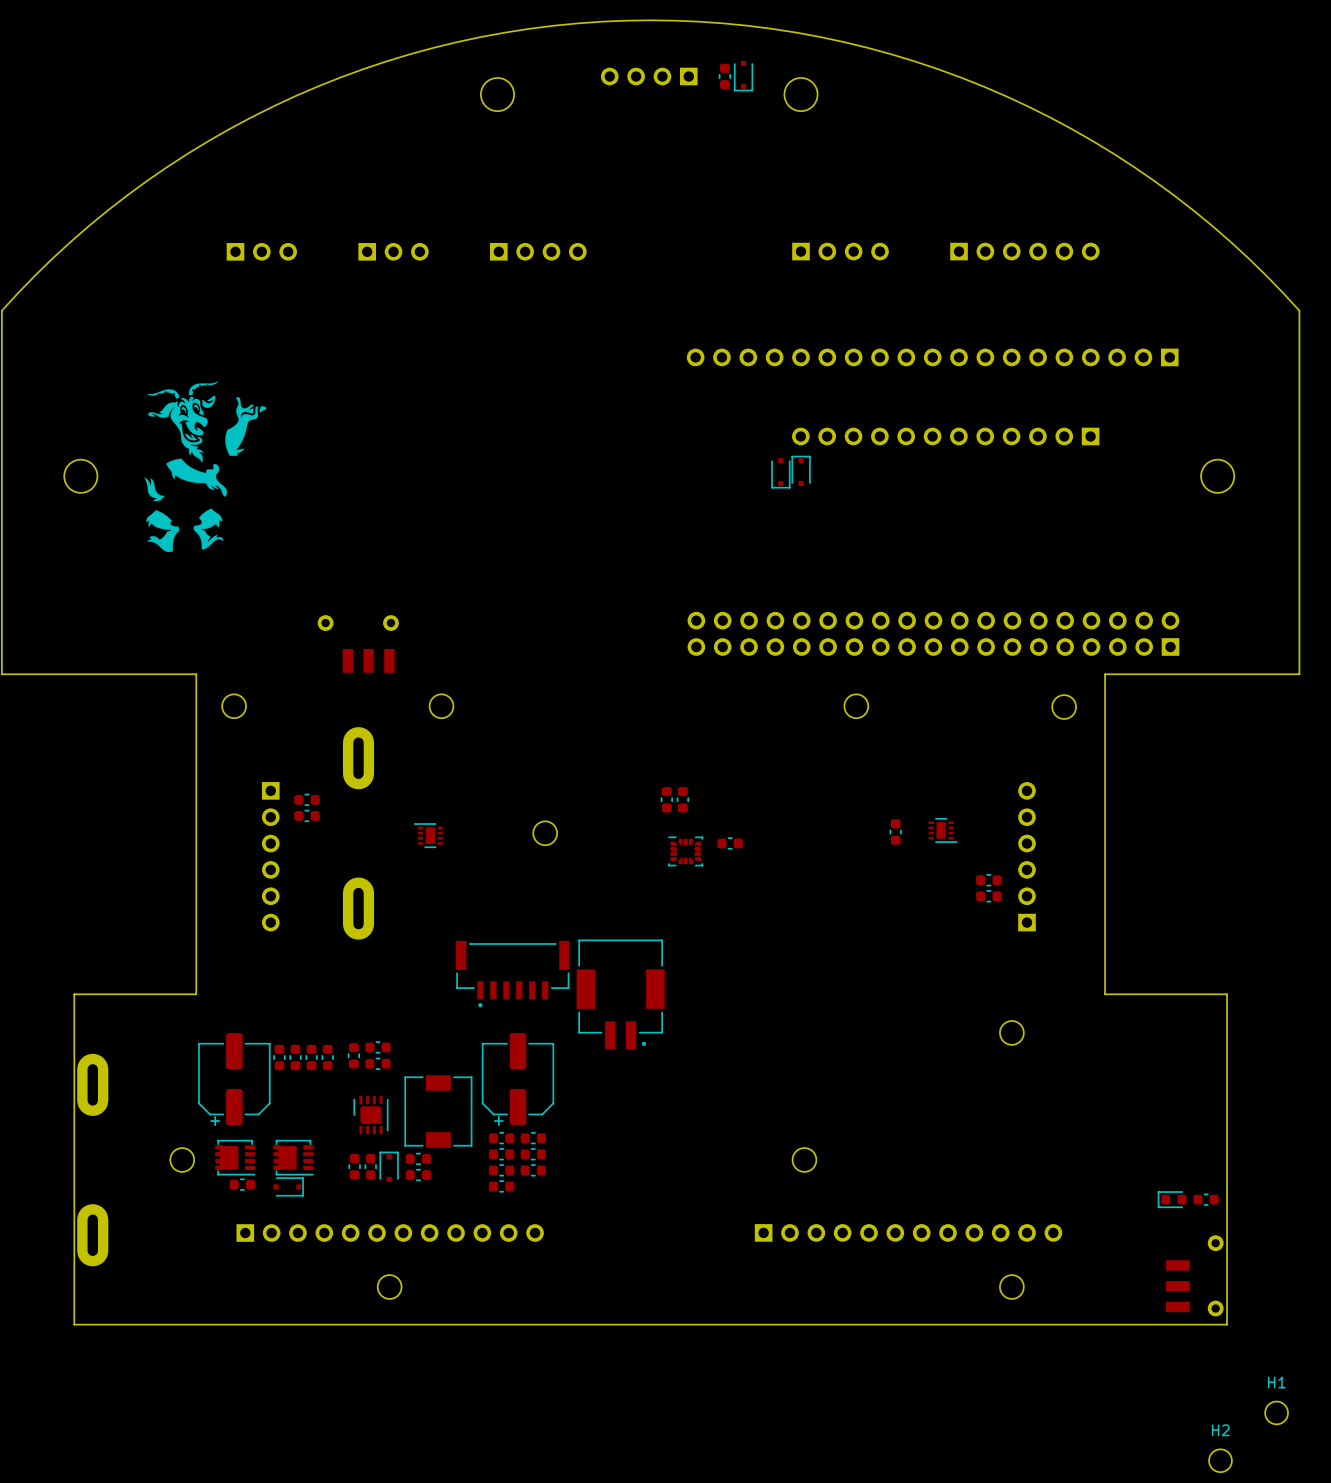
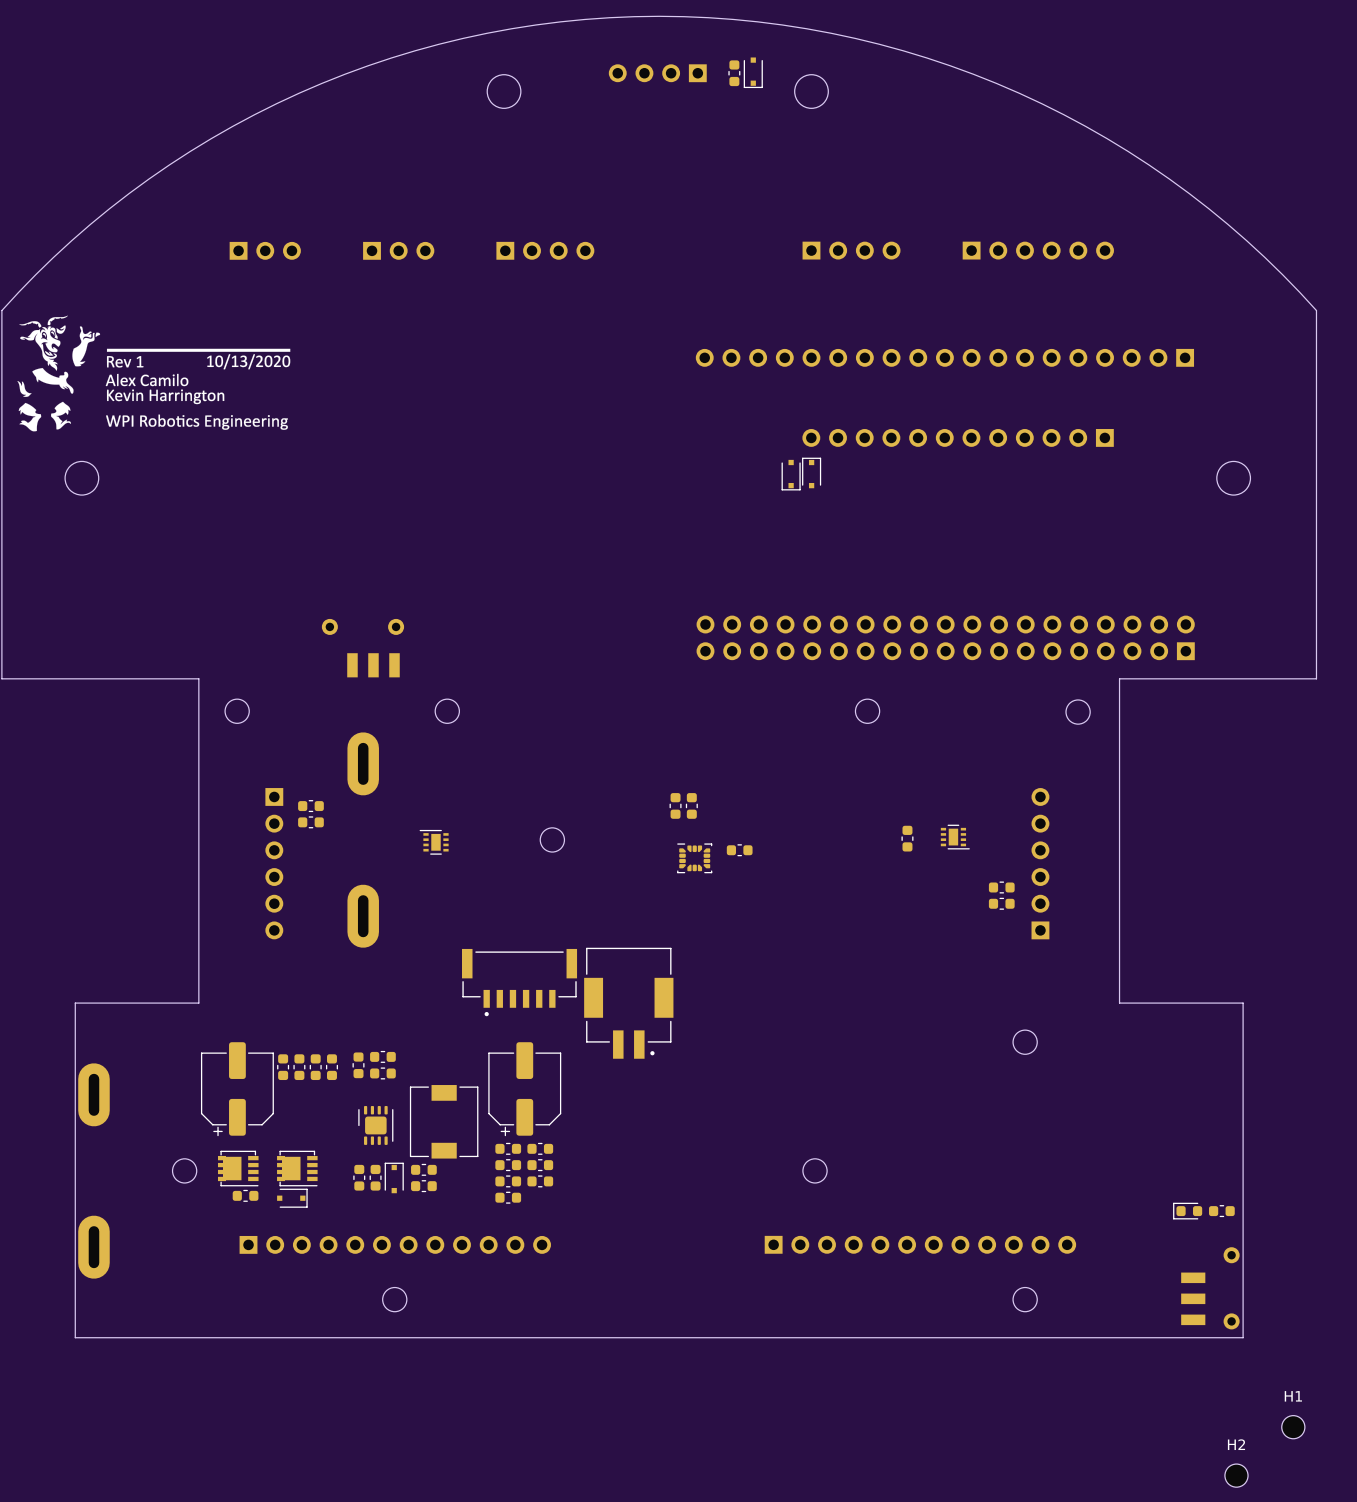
drawing: none -> [17, 315, 291, 432]
drawing: [144, 381, 267, 553] -> none

